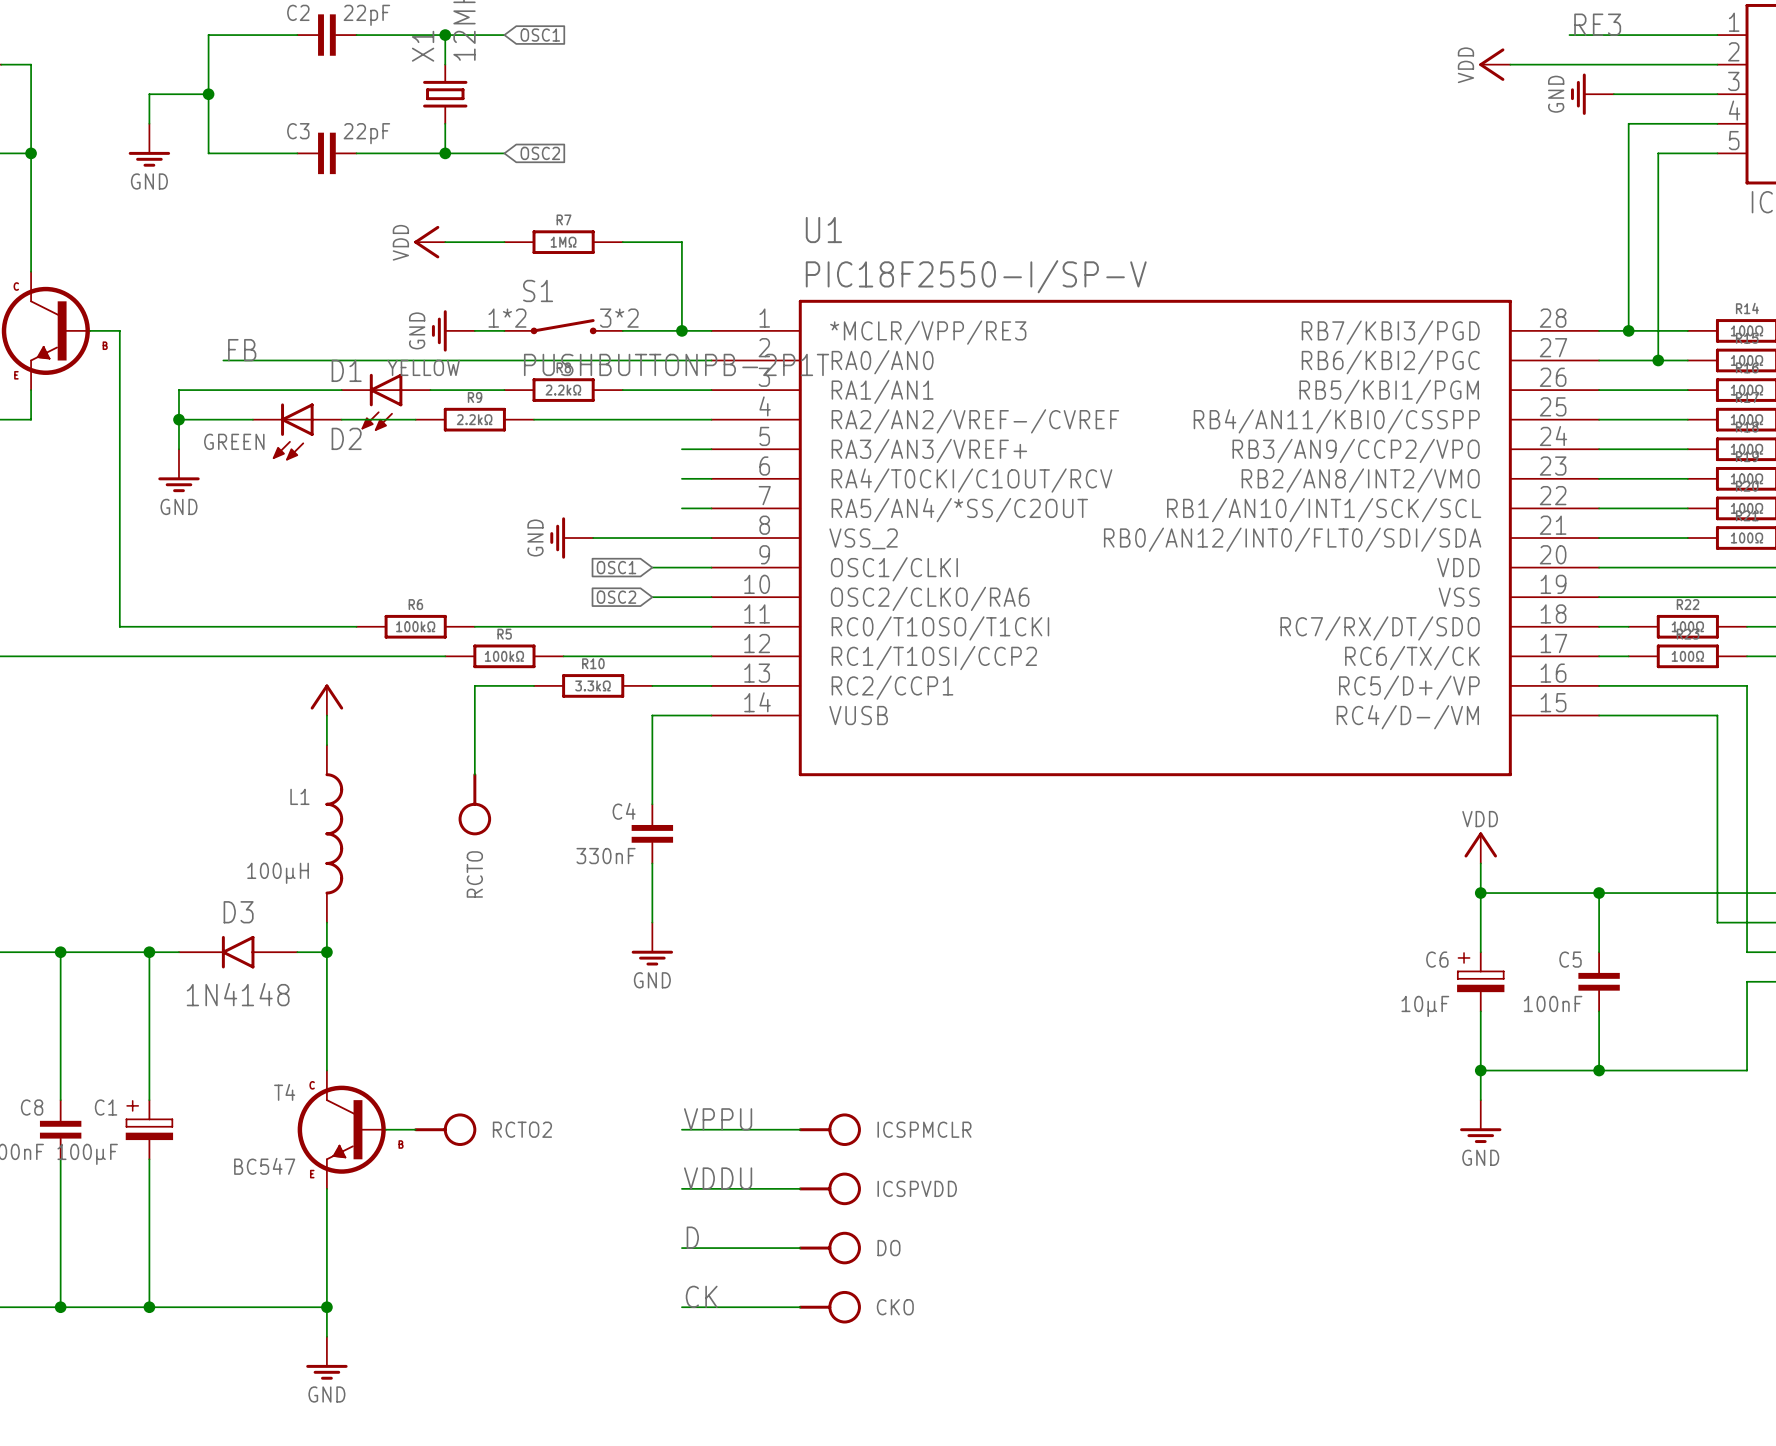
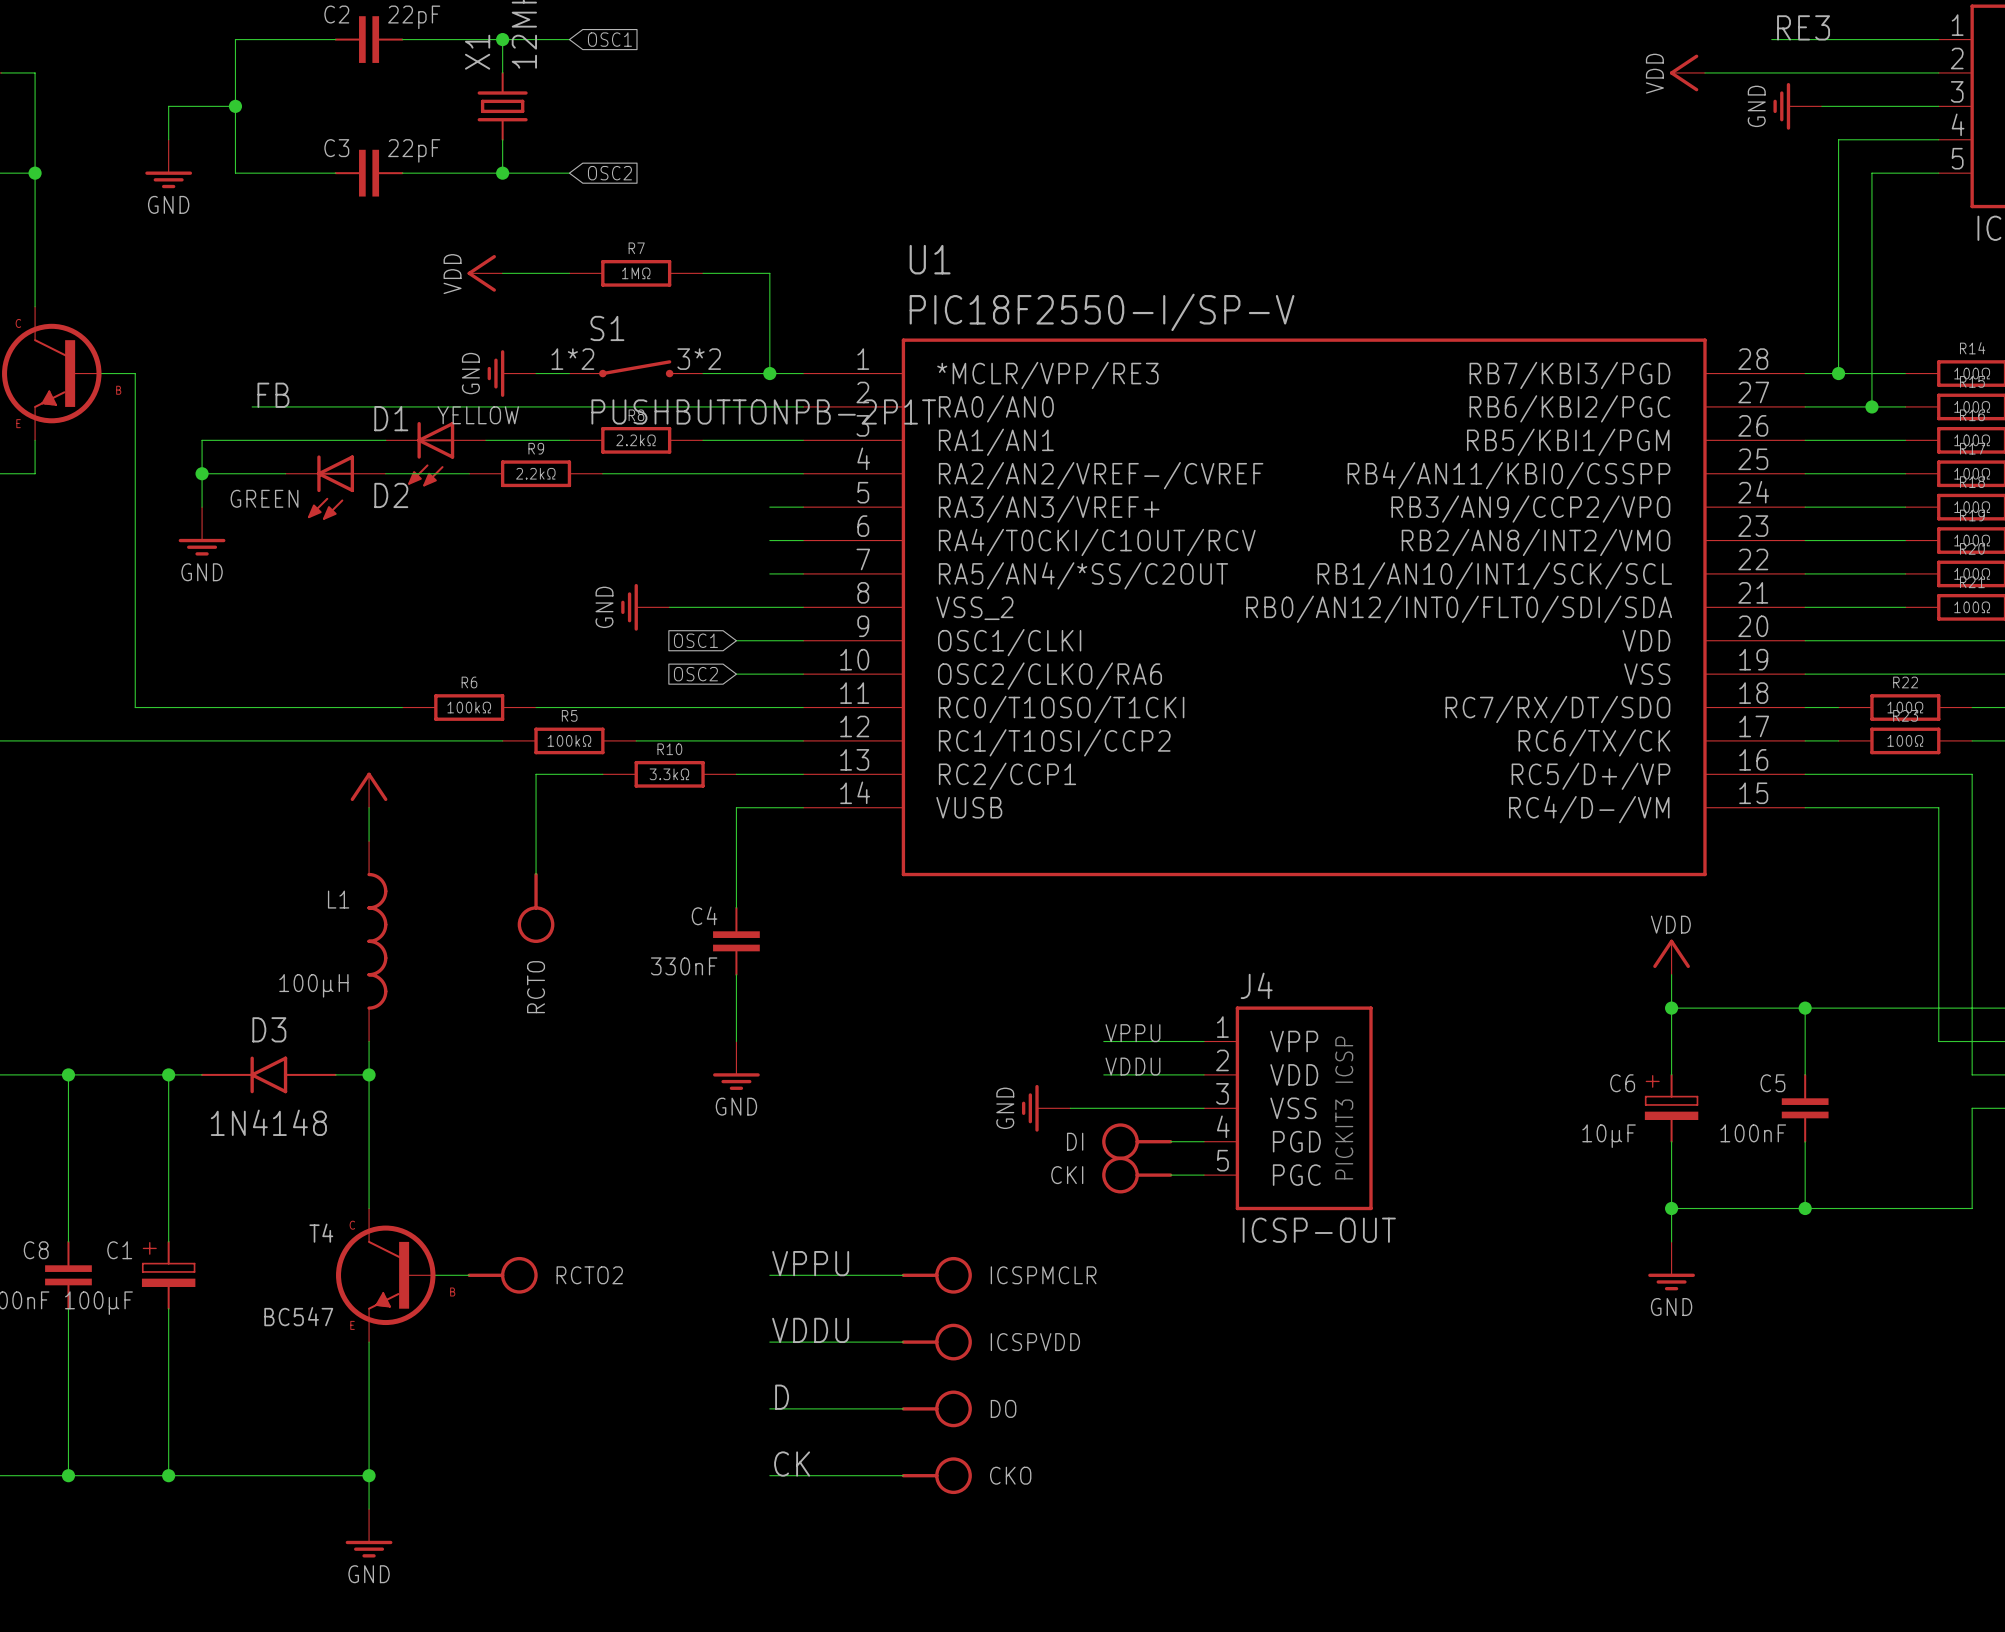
label: none -> VPPU (1132, 1033)
wire: none -> (1103, 1041) (1204, 1041)
label: none -> VDDU (1132, 1066)
wire: none -> (1103, 1074) (1204, 1074)
power symbol: none -> GND (1046, 1108)
wire: none -> (1070, 1108) (1204, 1108)
J4: none -> ICSP-OUT (1288, 1108)
DI: none -> (1137, 1141)
wire: none -> (1170, 1141) (1204, 1141)
CKI: none -> (1137, 1175)
wire: none -> (1170, 1175) (1204, 1175)

